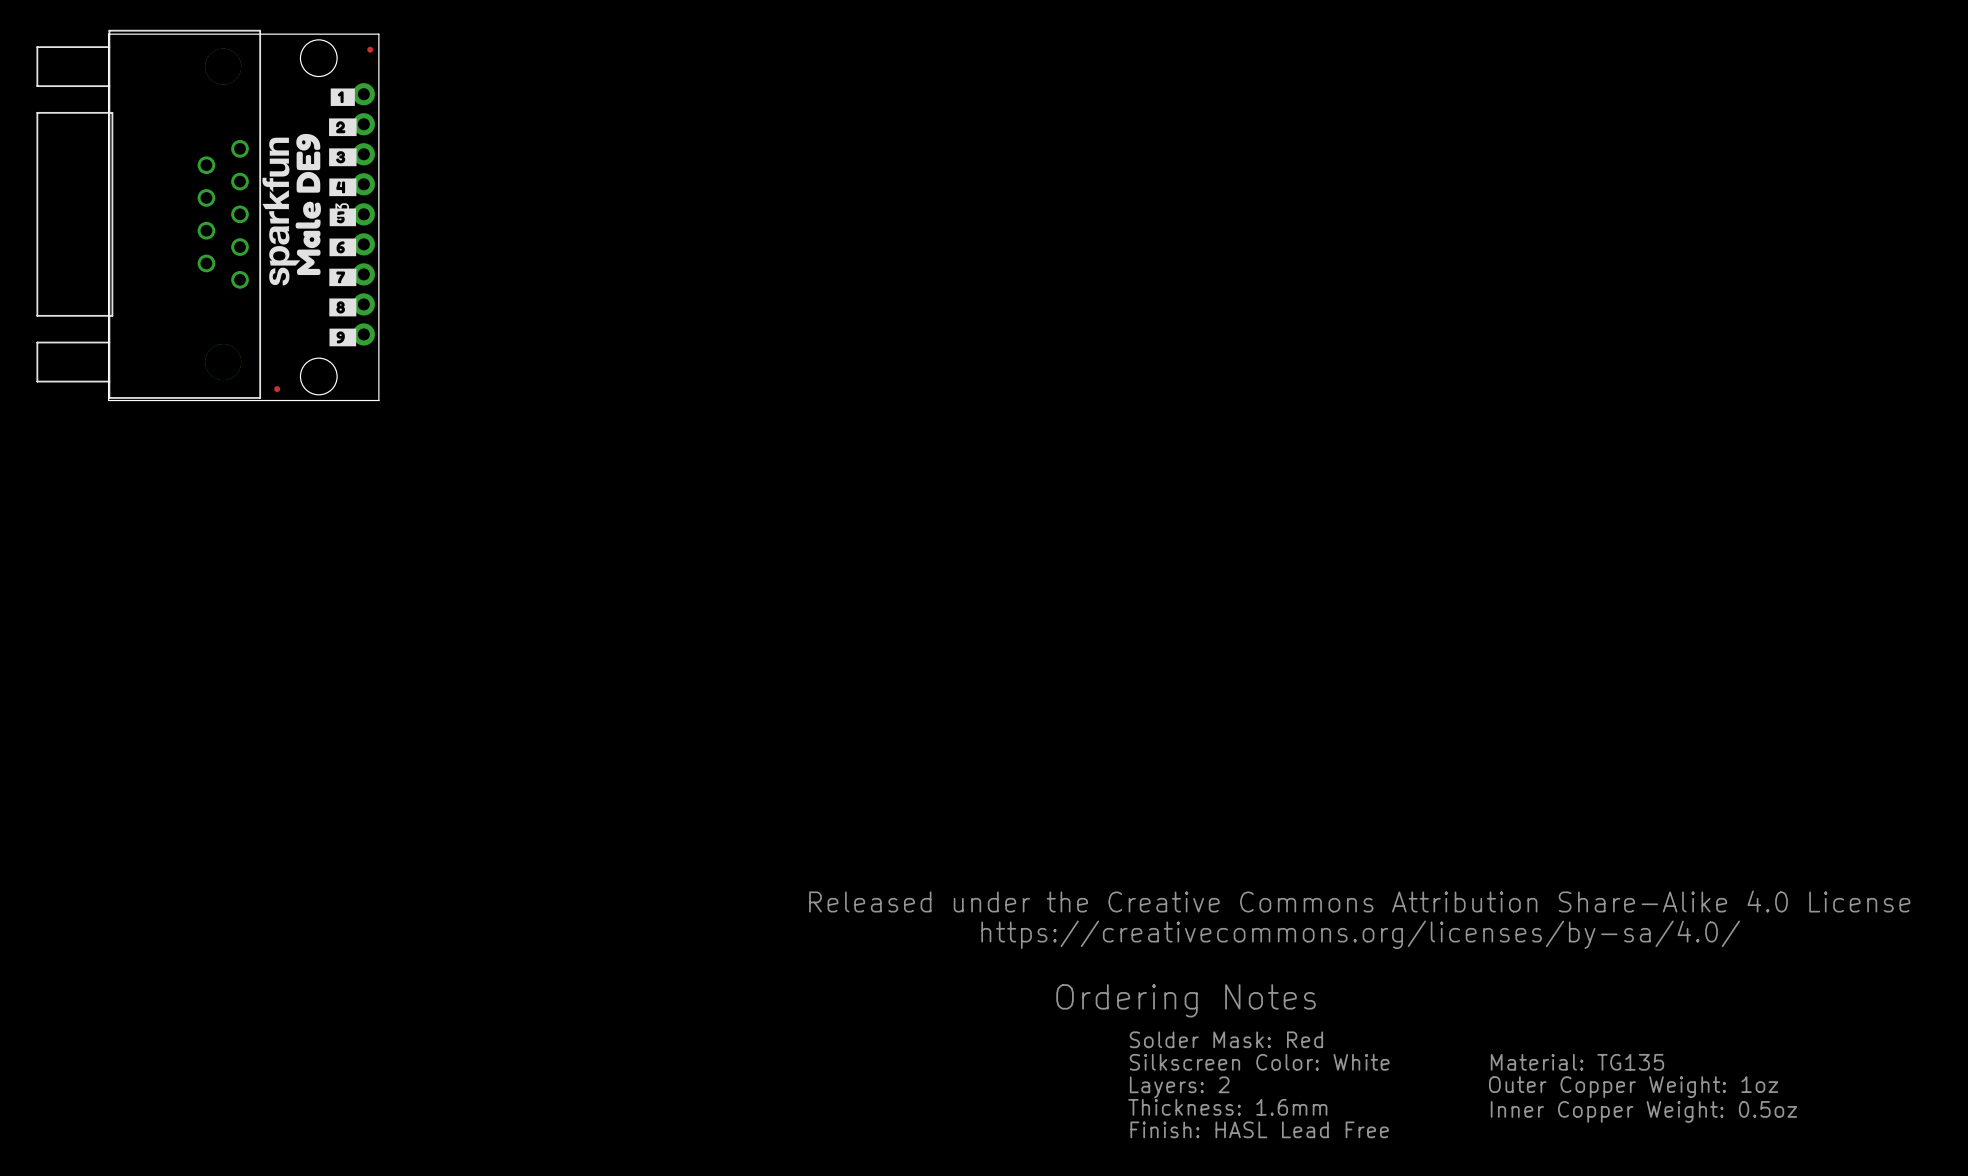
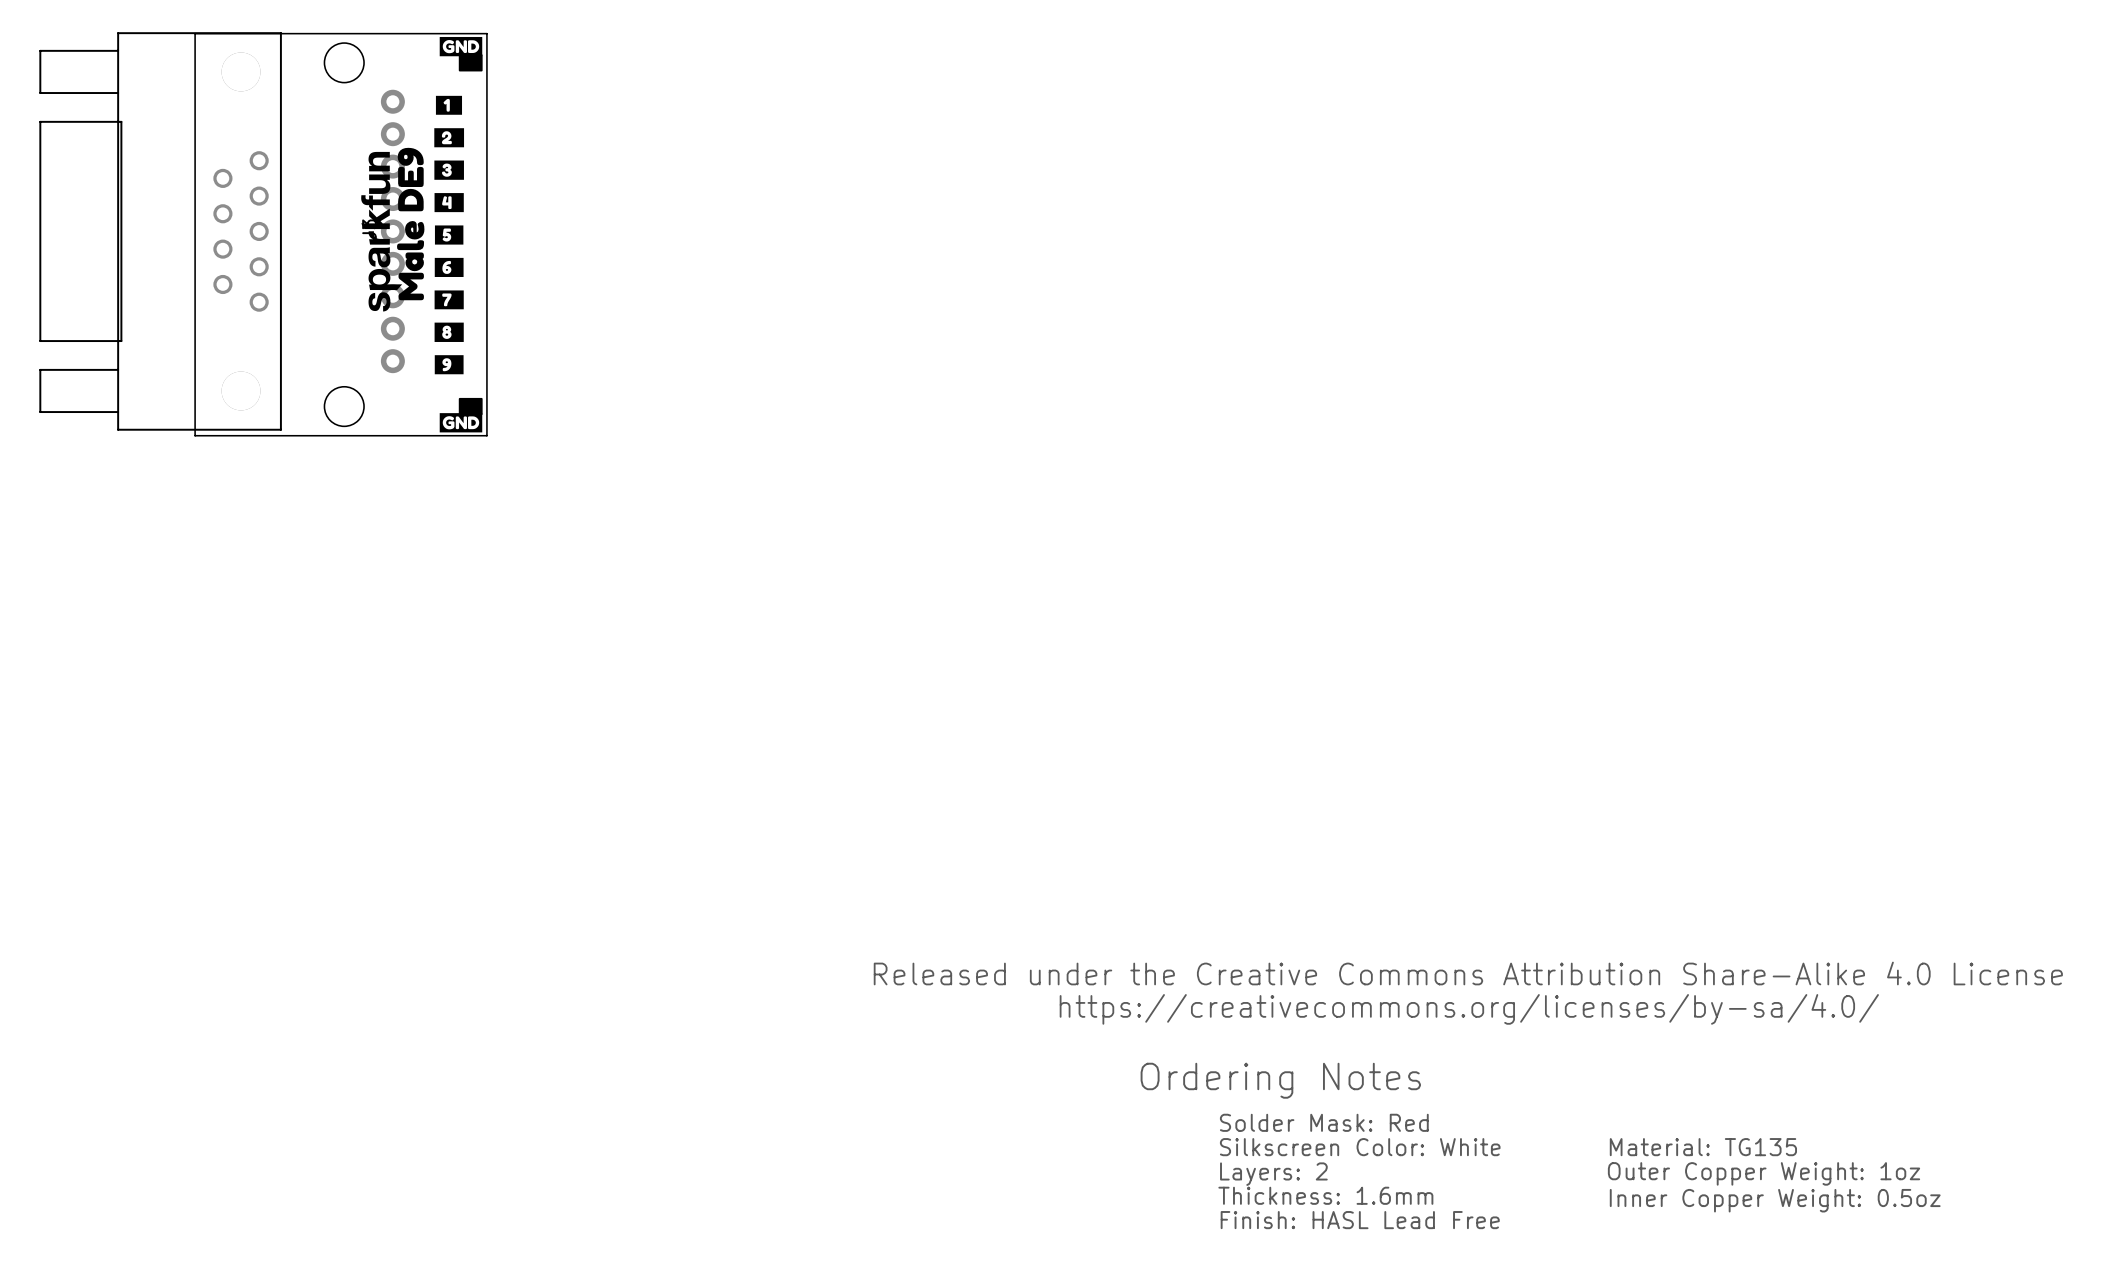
board edge: (108, 34) (378, 34) (378, 400) (108, 400) (108, 34) -> (195, 33) (195, 435) (486, 435) (486, 33) (195, 33)
drawing: none -> [439, 36, 483, 72]
part: (370, 49) -> none
drawing position: (342, 97) -> (448, 105)
drawing position: (342, 127) -> (449, 137)
drawing position: (342, 157) -> (449, 170)
drawing position: (308, 163) -> (410, 179)
drawing position: (342, 187) -> (449, 202)
drawing position: (281, 211) -> (381, 231)
drawing position: (342, 217) -> (449, 235)
drawing position: (308, 238) -> (410, 260)
drawing position: (342, 247) -> (449, 267)
drawing position: (342, 277) -> (449, 299)
drawing position: (342, 307) -> (449, 332)
drawing position: (342, 337) -> (449, 364)
drawing: none -> [439, 397, 483, 433]
part: (277, 389) -> none

